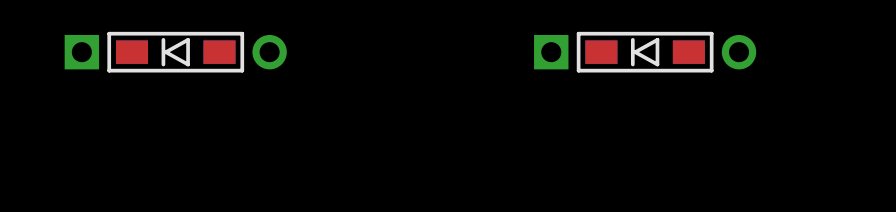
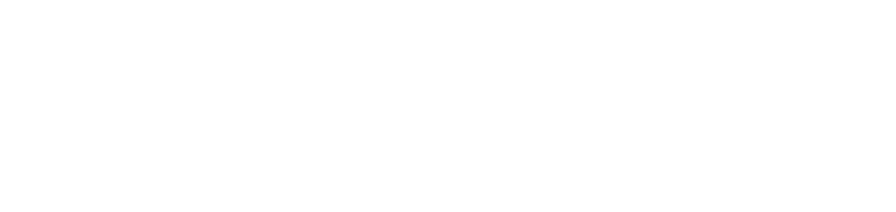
part: (175, 52) -> none
part: (645, 52) -> none

